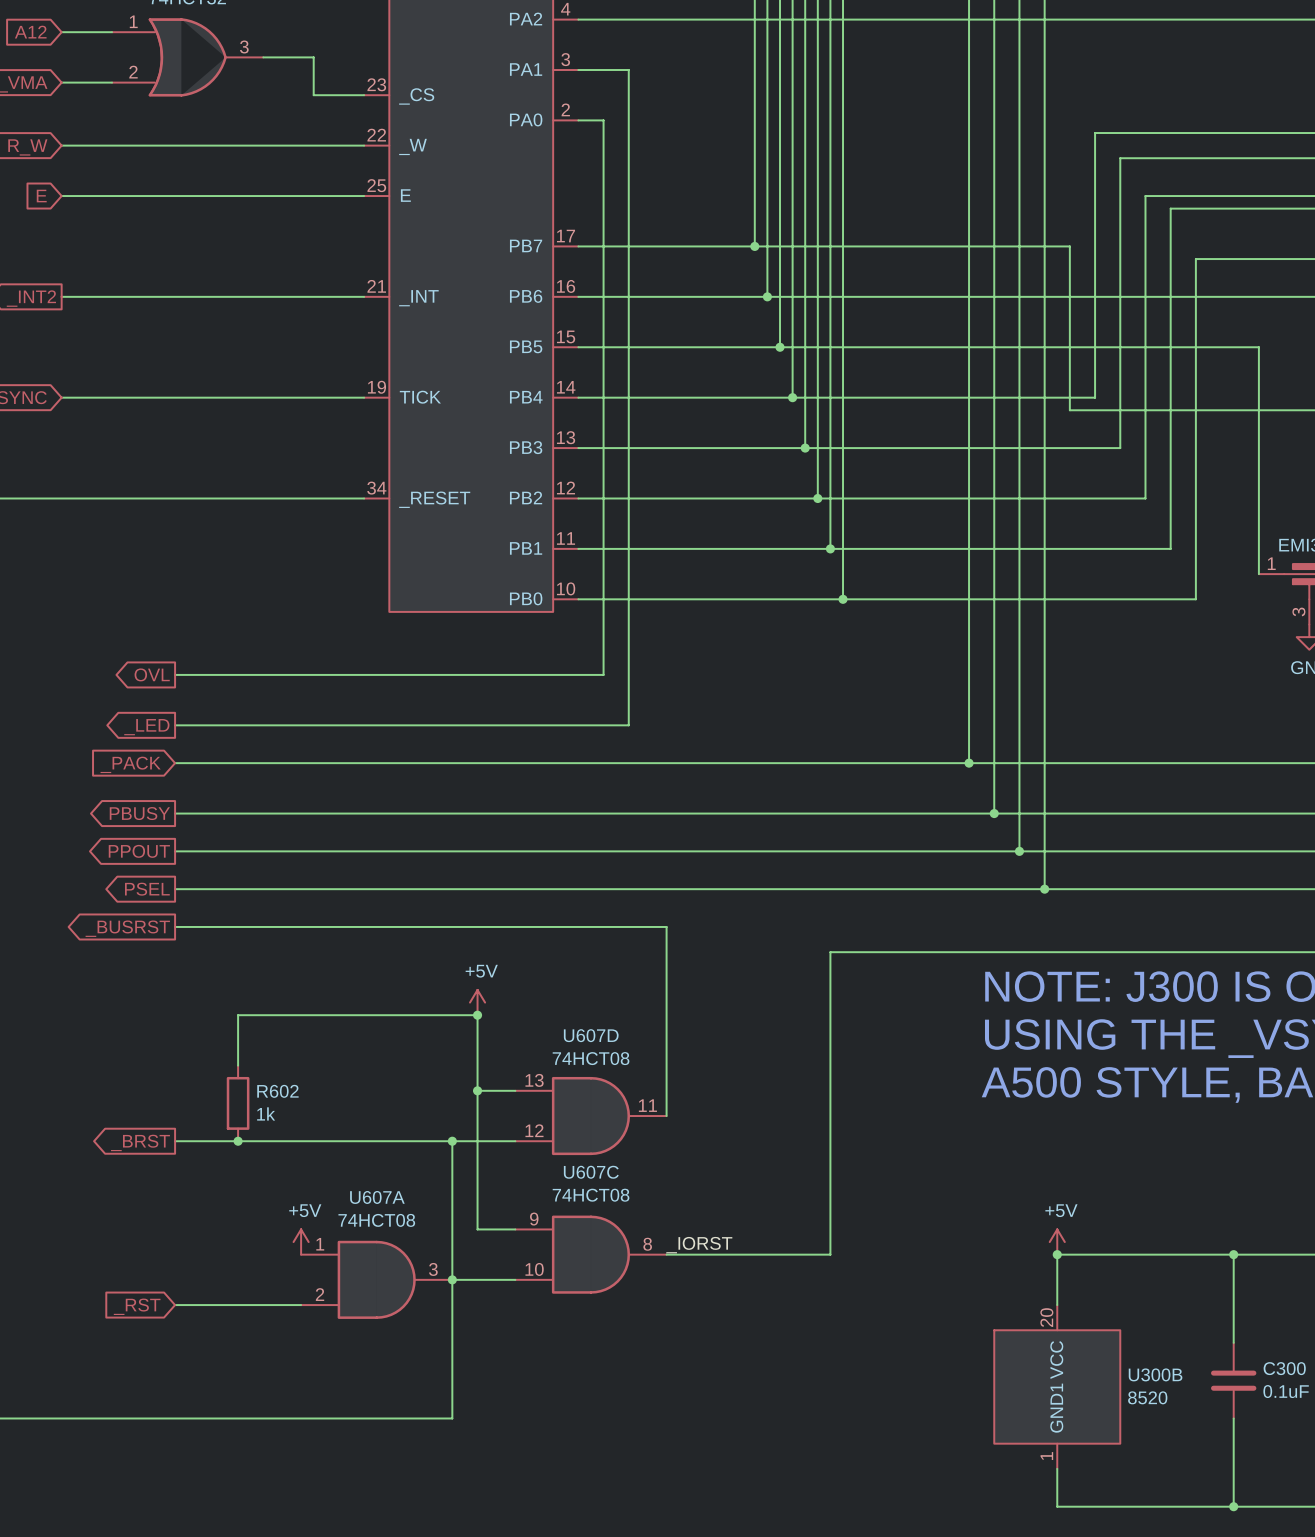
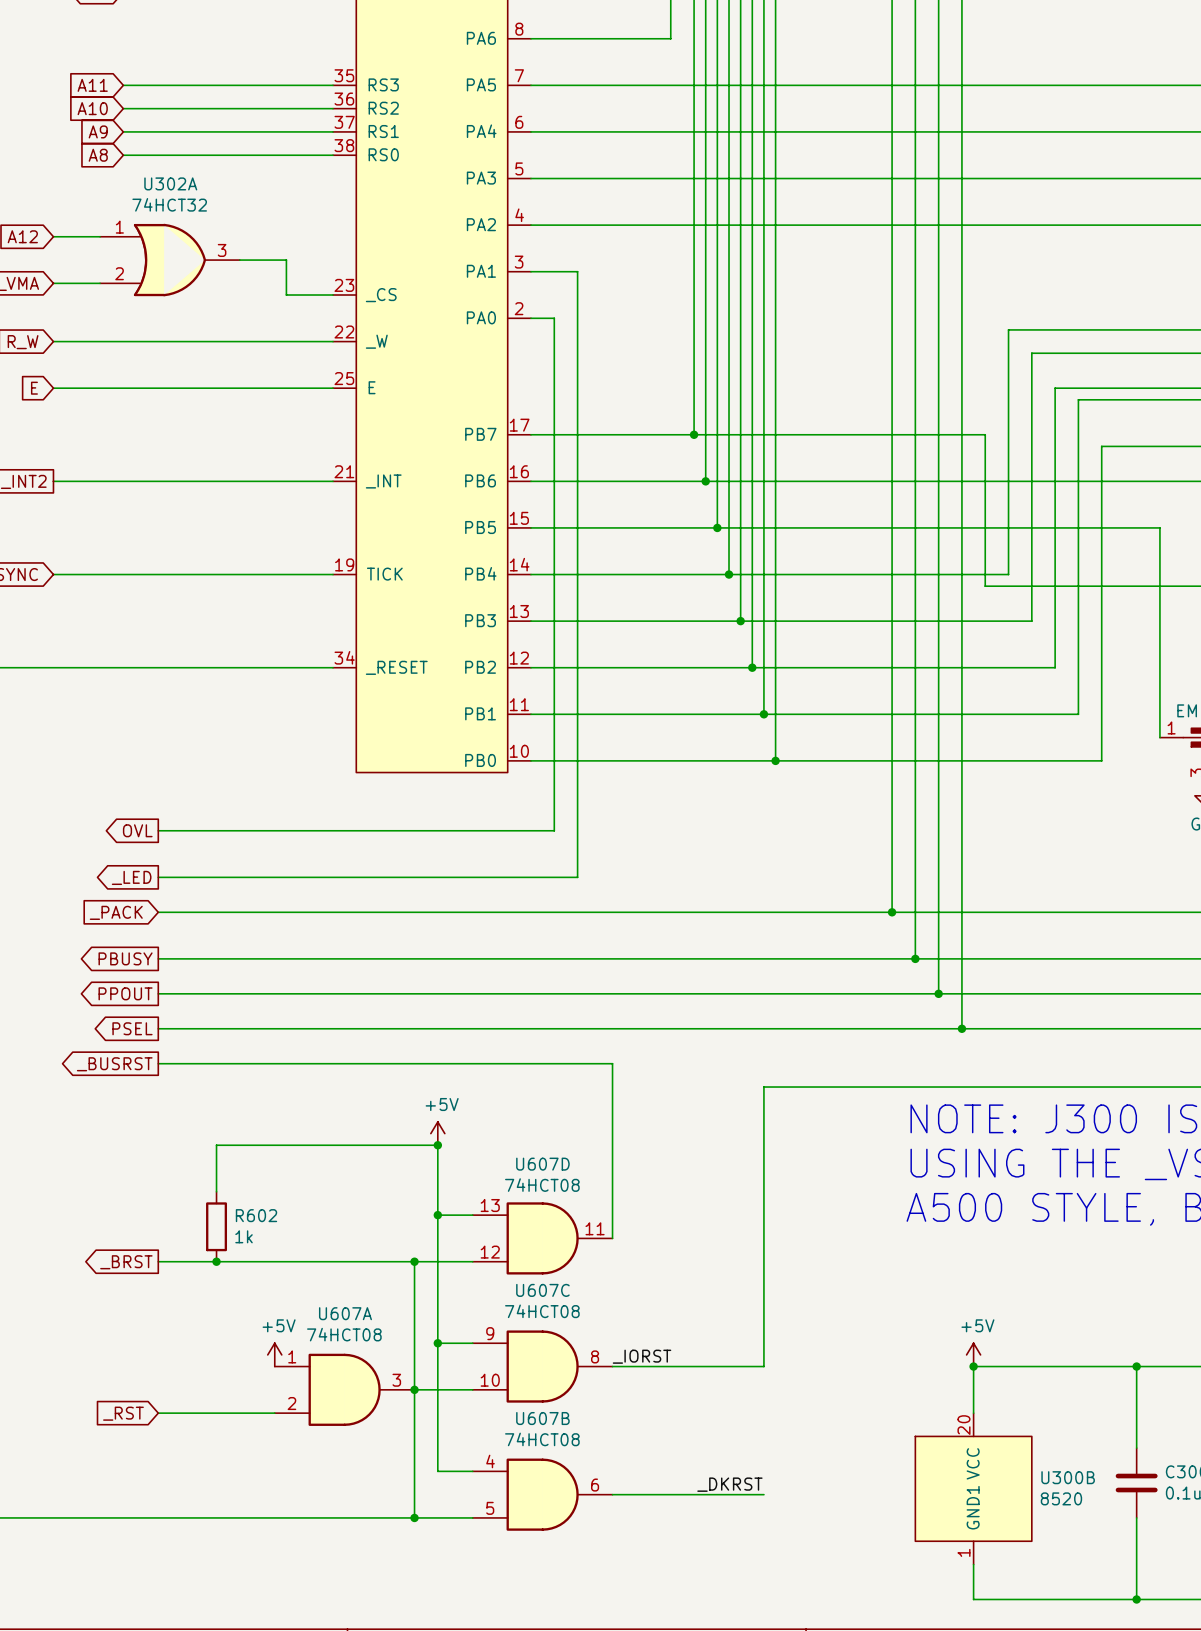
wire: none -> (437, 1343) (437, 1471) (472, 1471)
junction: none -> (437, 1343)
label: none -> _DKRST (729, 1484)
U607B: none -> 74HCT08 (542, 1494)
wire: none -> (612, 1494) (763, 1494)
wire: none -> (414, 1517) (472, 1517)
junction: none -> (414, 1517)

